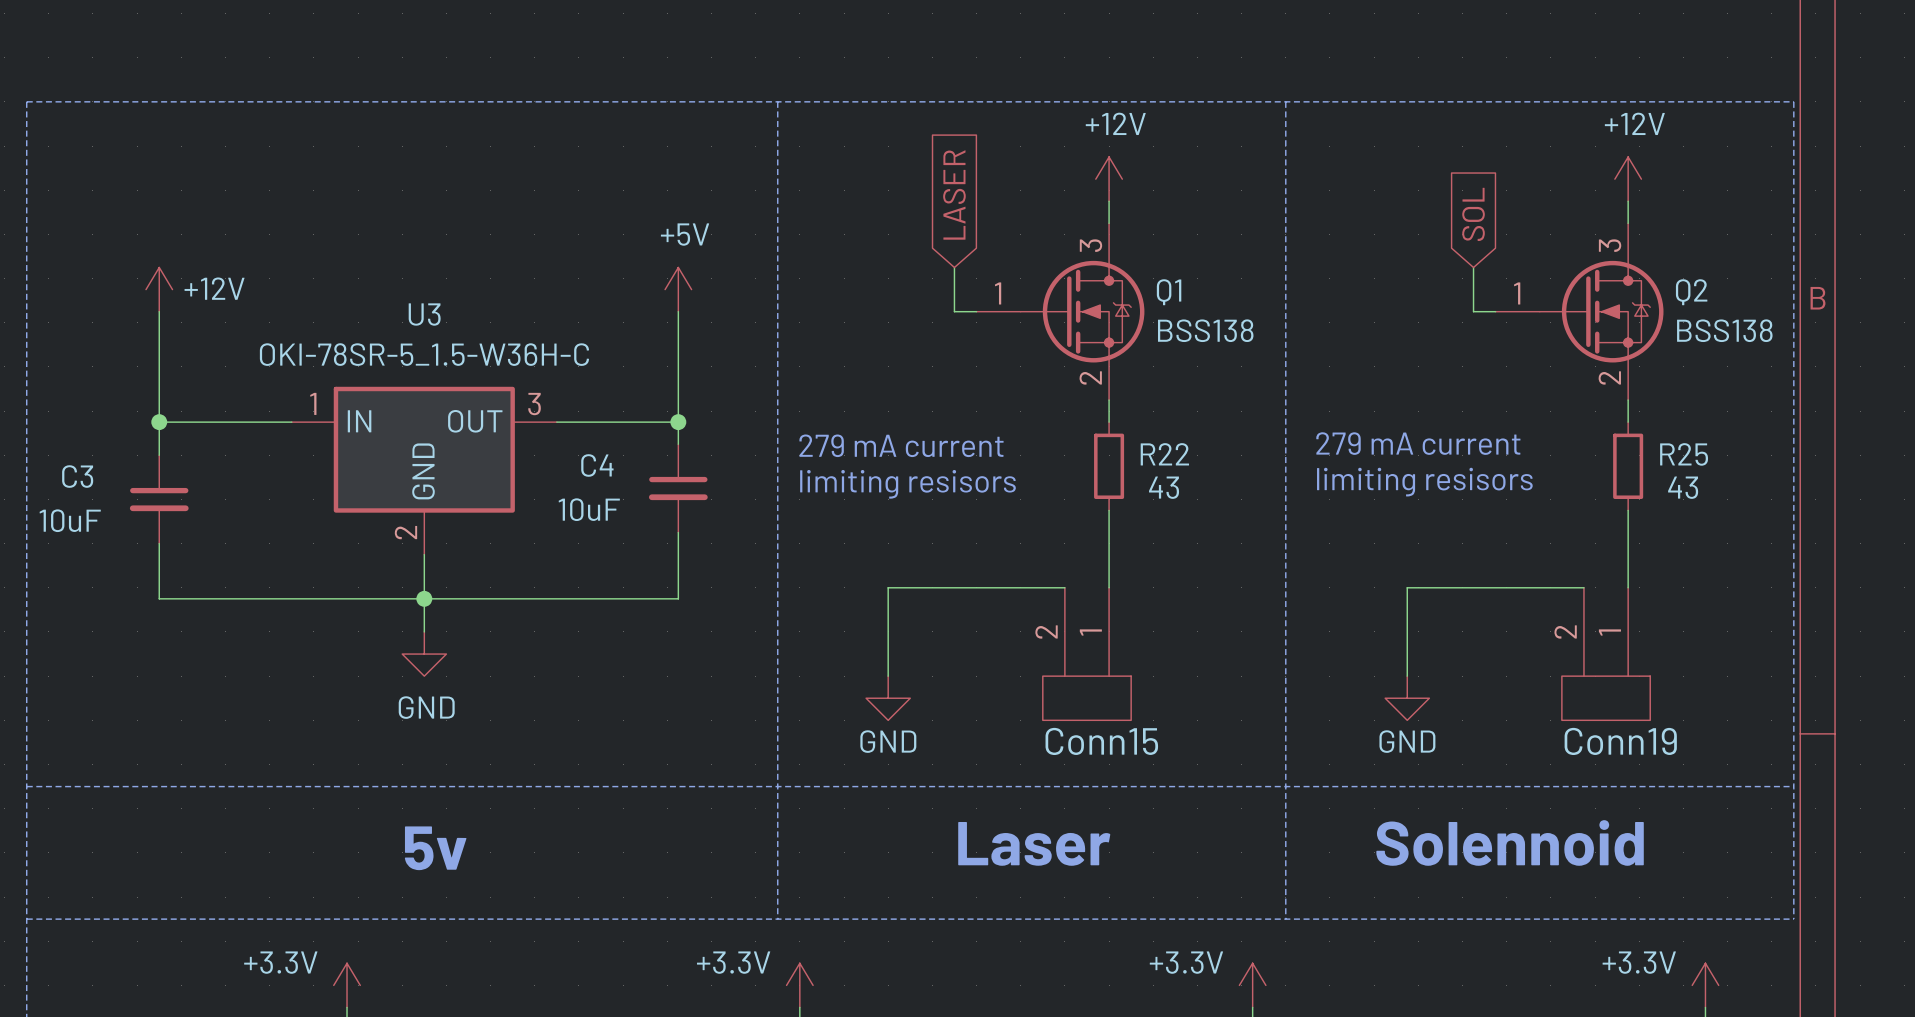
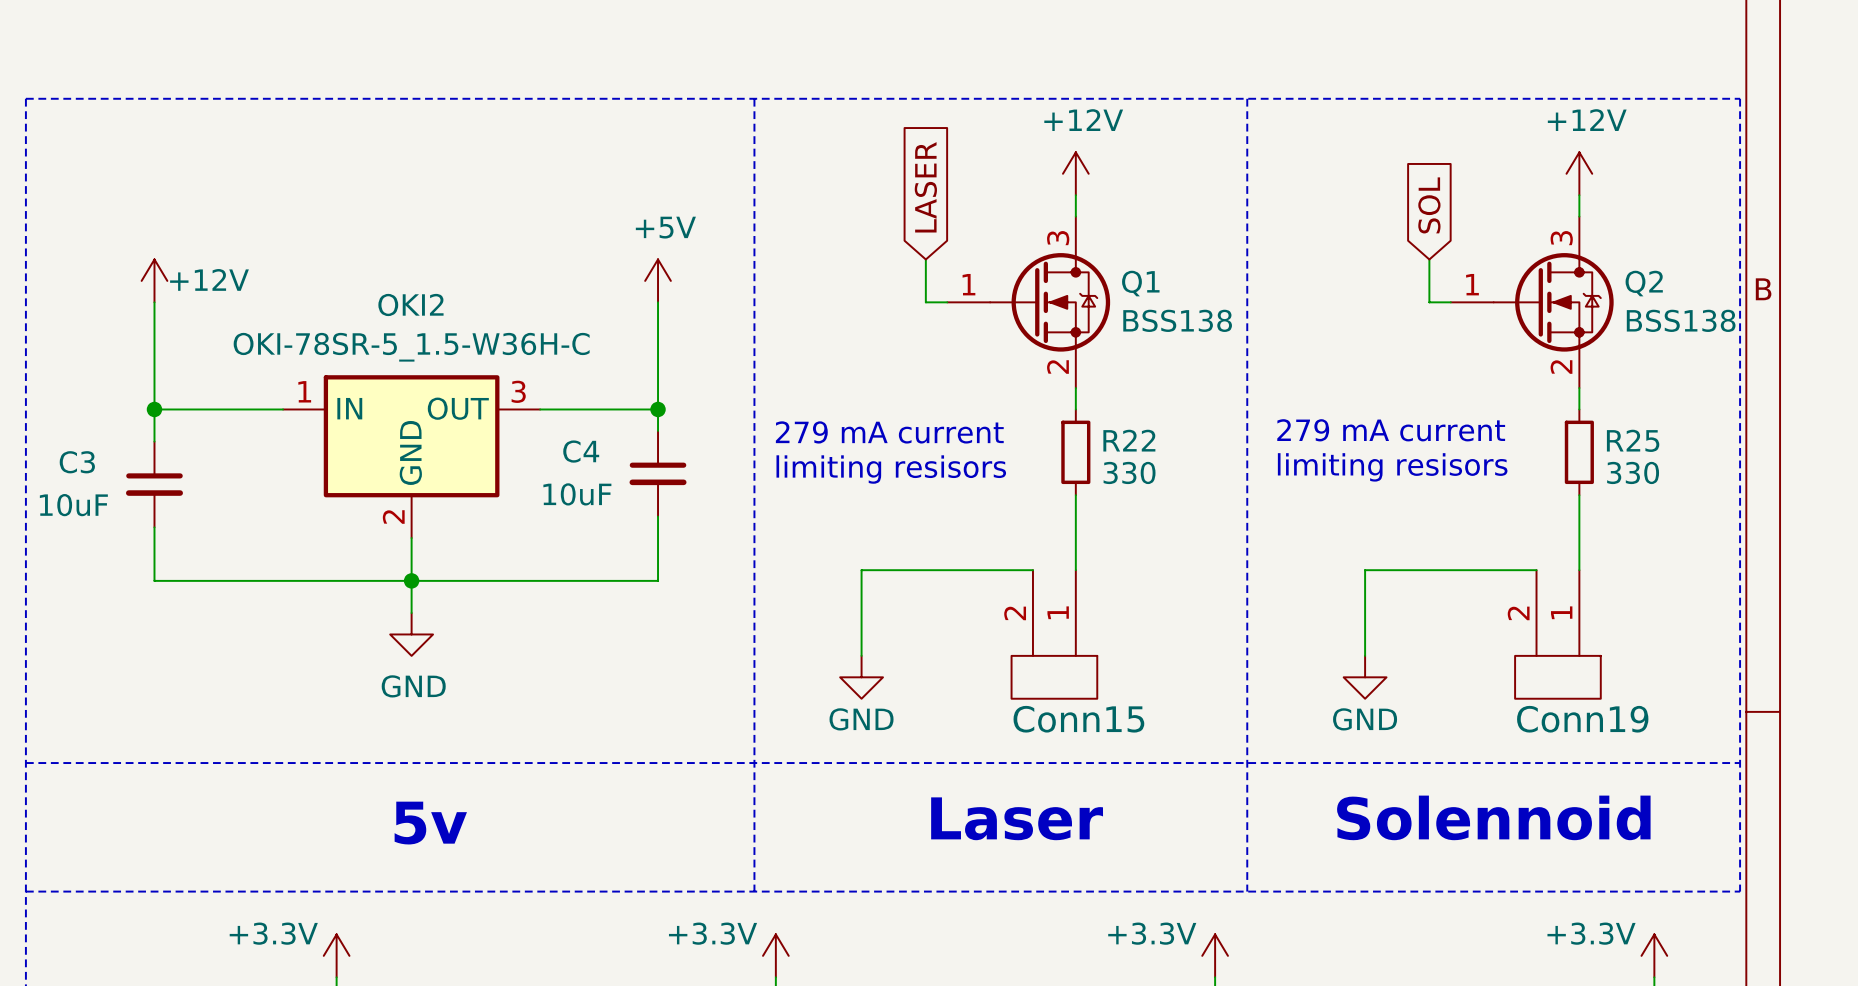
U3 name: U3 (424, 314) -> OKI2 (410, 304)
R22 value: 43 (1164, 487) -> 330 (1129, 472)
R25 value: 43 (1683, 487) -> 330 (1633, 472)

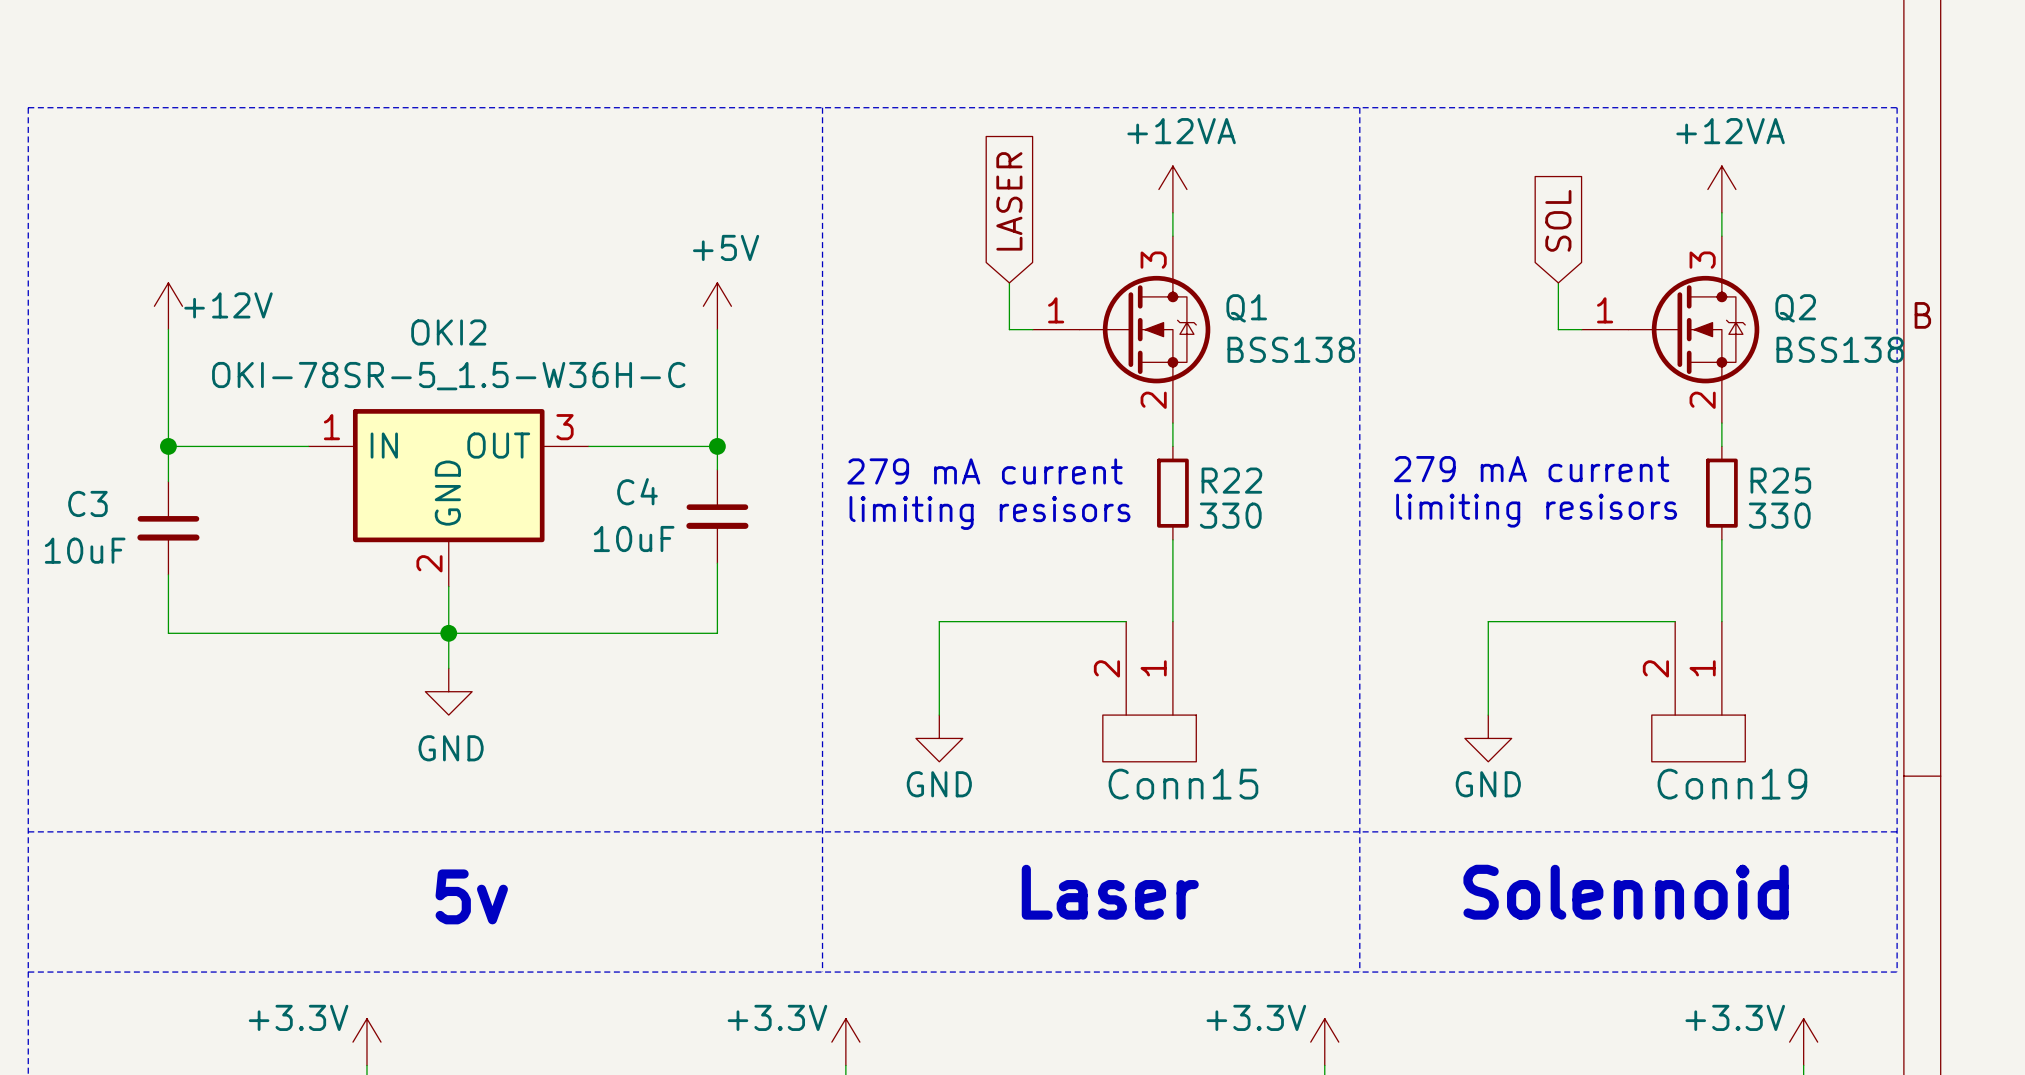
power symbol: +12V (1075, 173) -> +12VA (1172, 189)
power symbol: +12V (1579, 173) -> +12VA (1721, 189)

